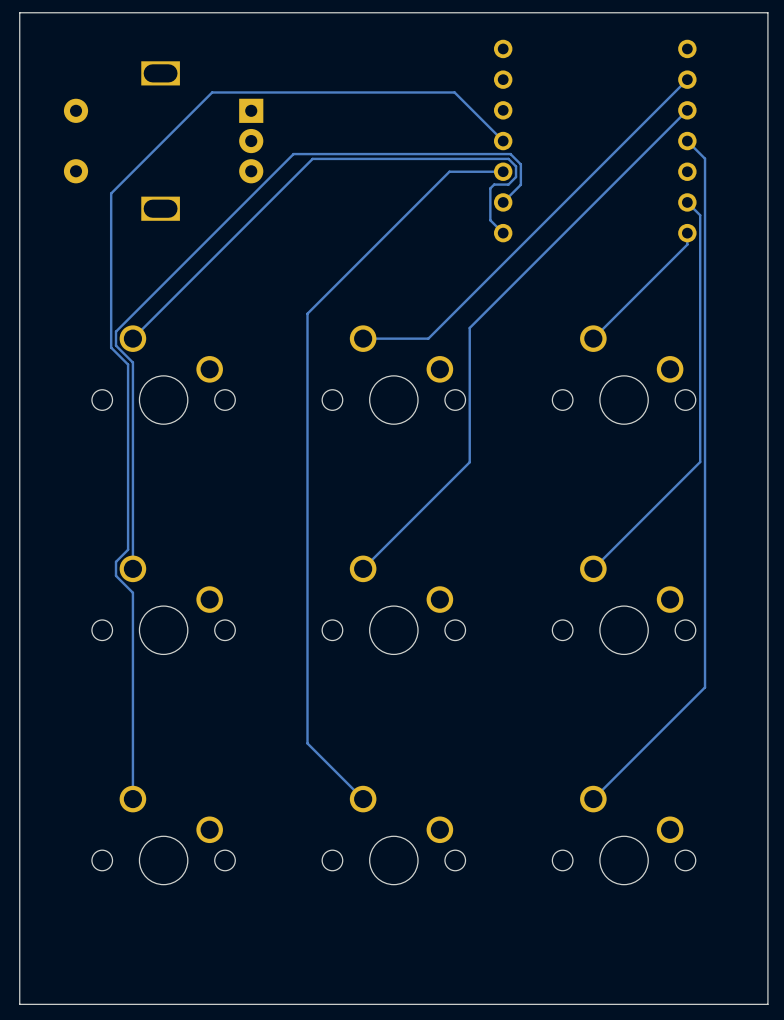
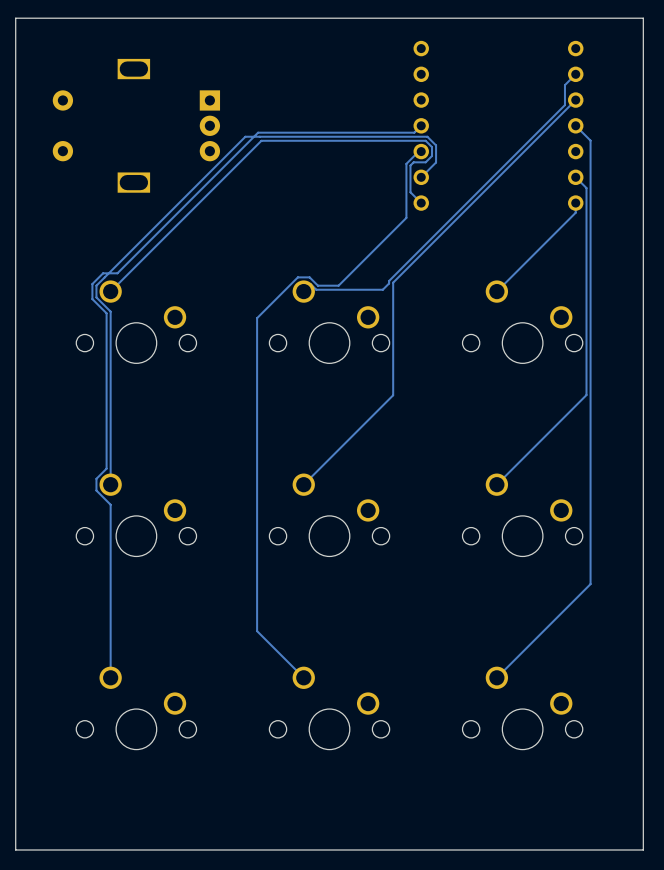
track: (674, 92) (428, 338) (363, 338) -> (564, 85) (564, 105) (389, 280) (382, 289) (316, 289) (310, 284) (303, 291)
track: (503, 141) (454, 92) (212, 92) (111, 193) (111, 329) -> (421, 125) (414, 132) (258, 132) (117, 273) (103, 273) (92, 284)
track: (500, 171) (449, 171) (307, 313) (307, 370) -> (418, 151) (406, 163) (406, 217) (338, 285) (317, 285) (309, 277) (297, 277) (257, 318)

